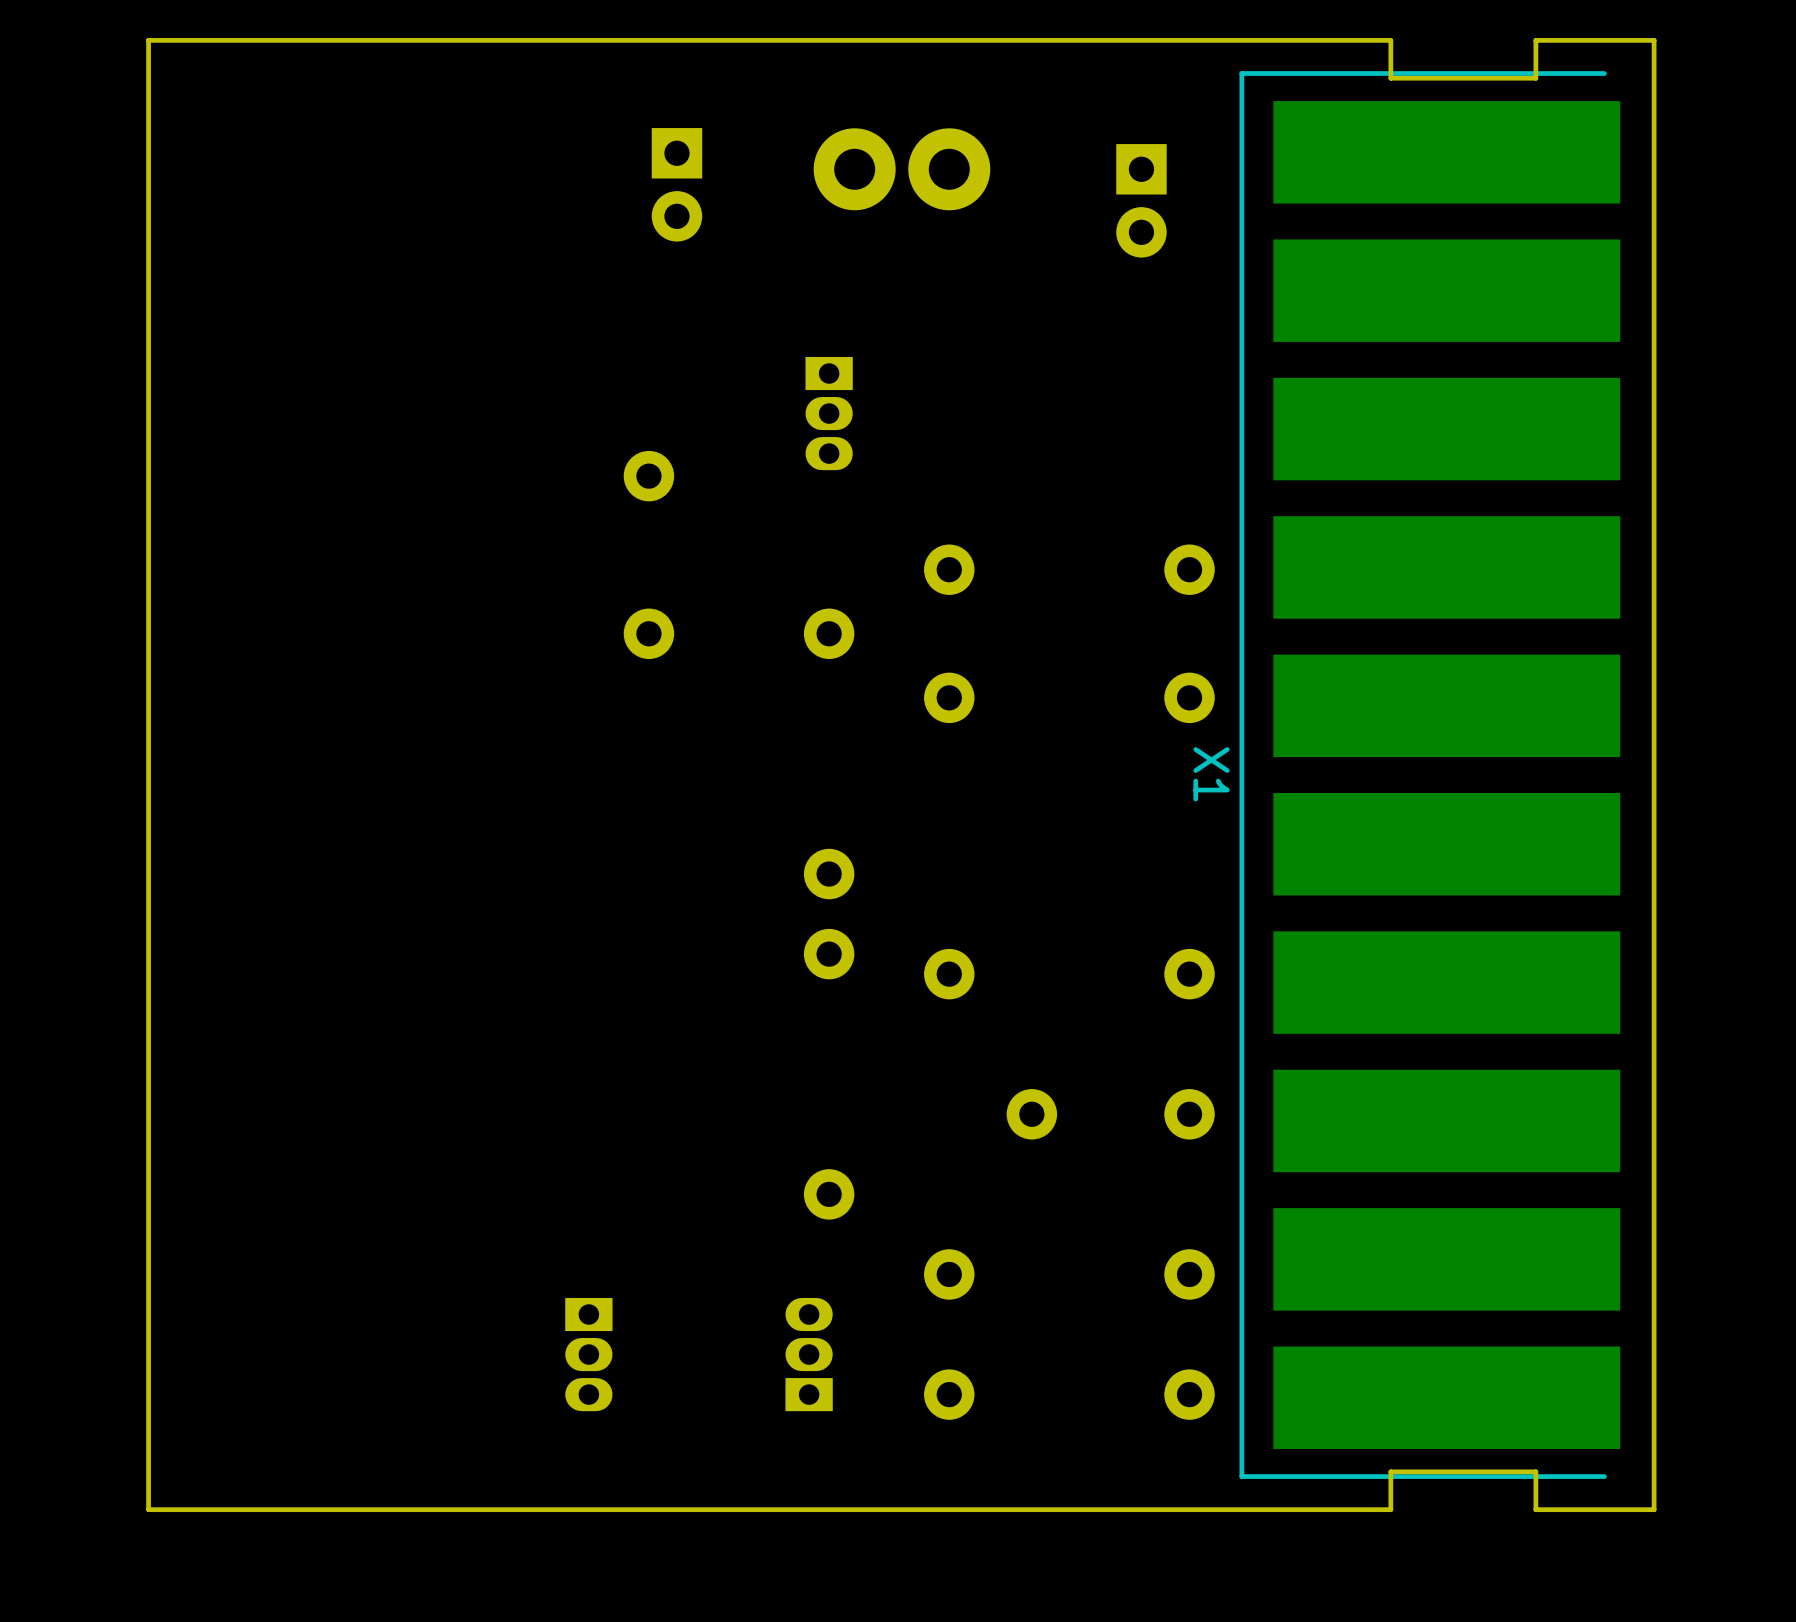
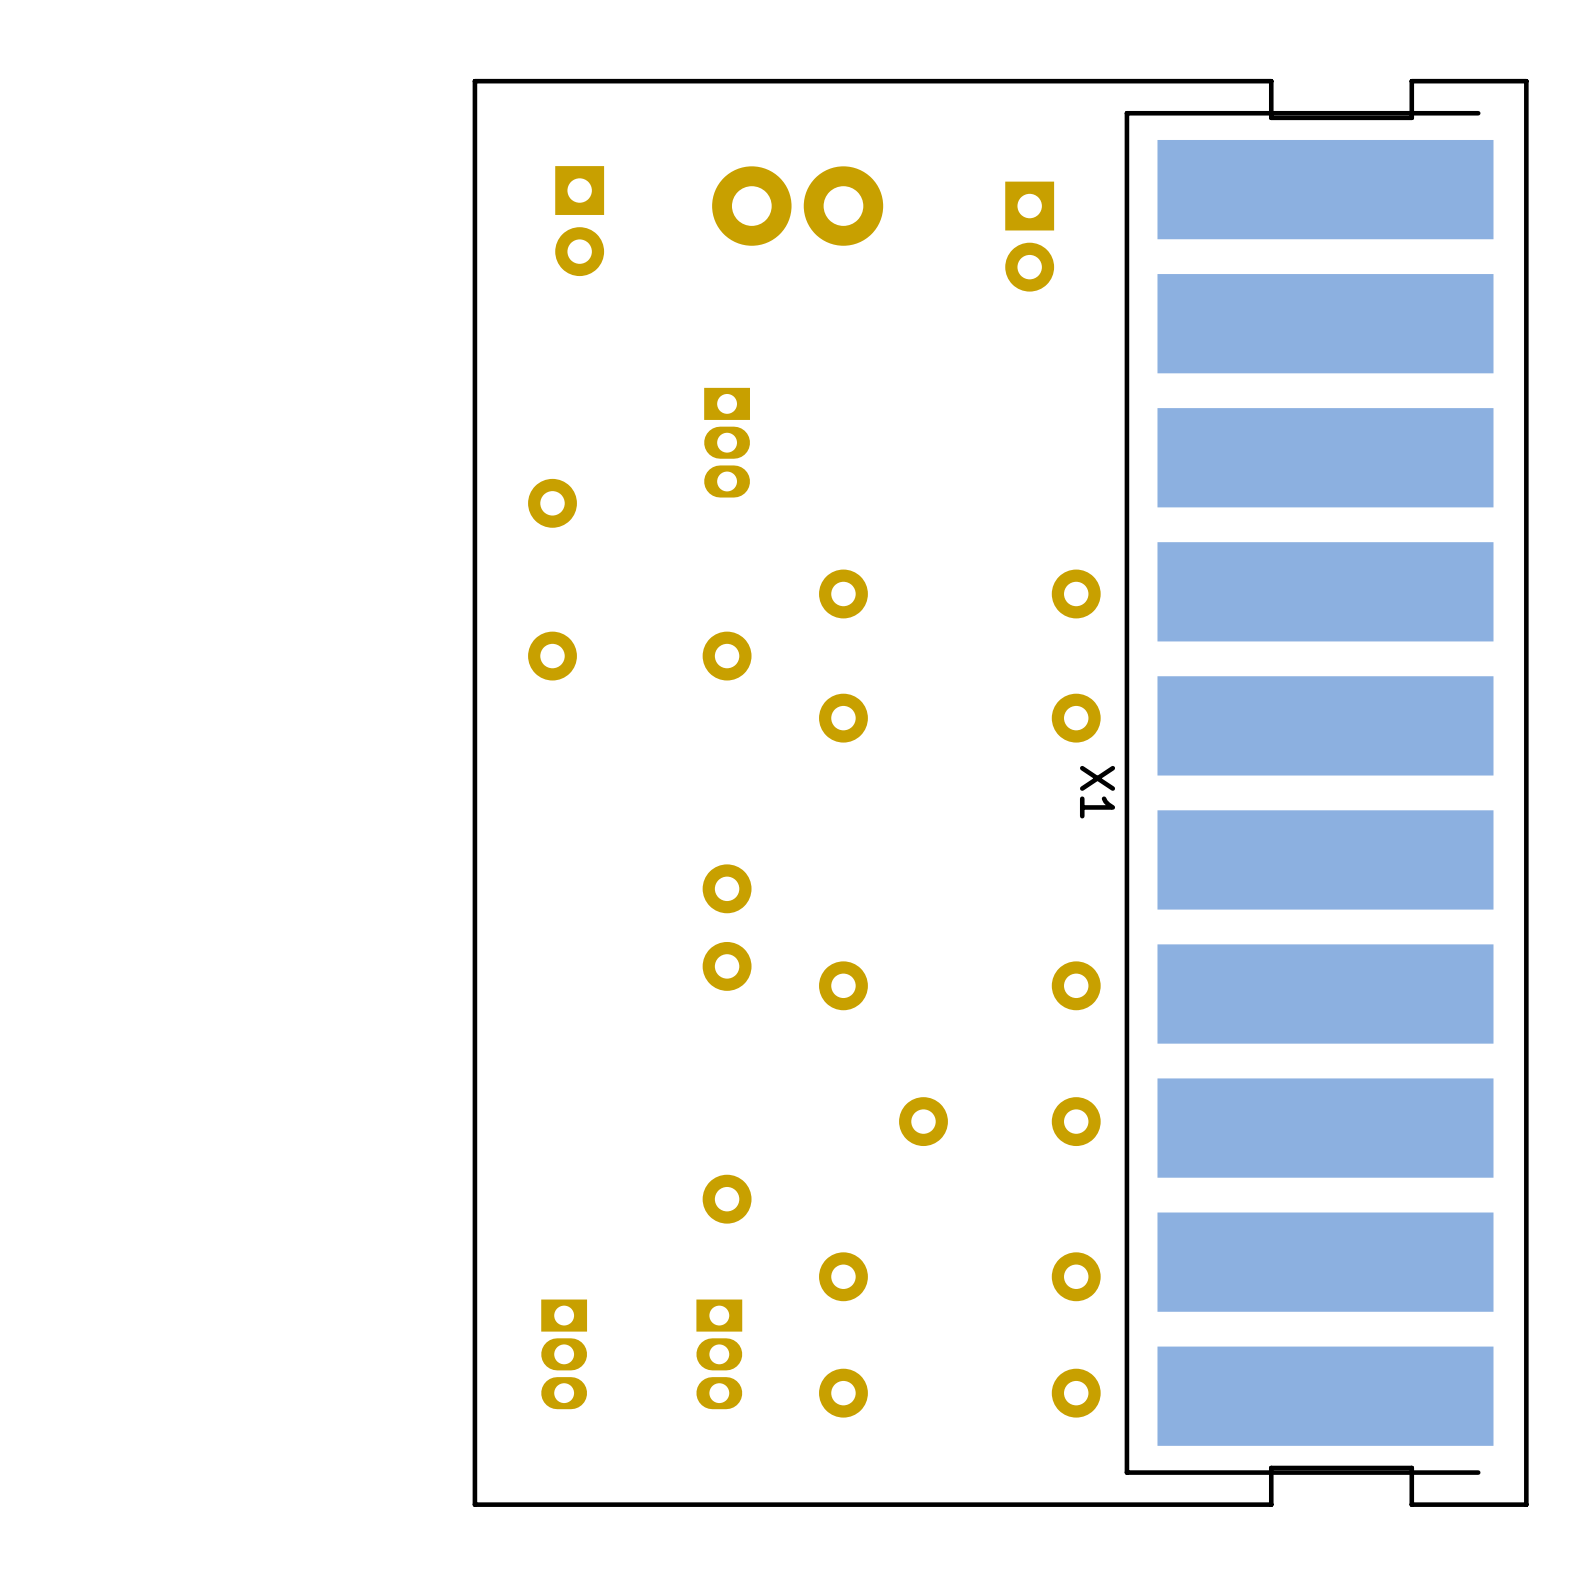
board edge: (568, 40) (148, 40) (148, 1509) (568, 1509) -> (474, 81) (474, 1504)
part position: (588, 1354) -> (564, 1354)
part rotation: 0° (809, 1354) -> 180° (719, 1354)

